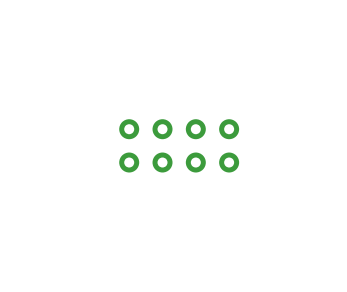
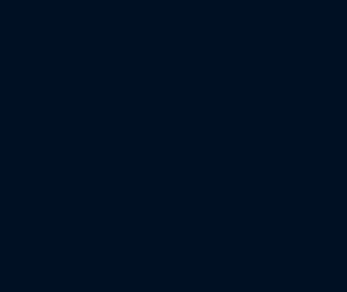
part: (179, 145) -> none

